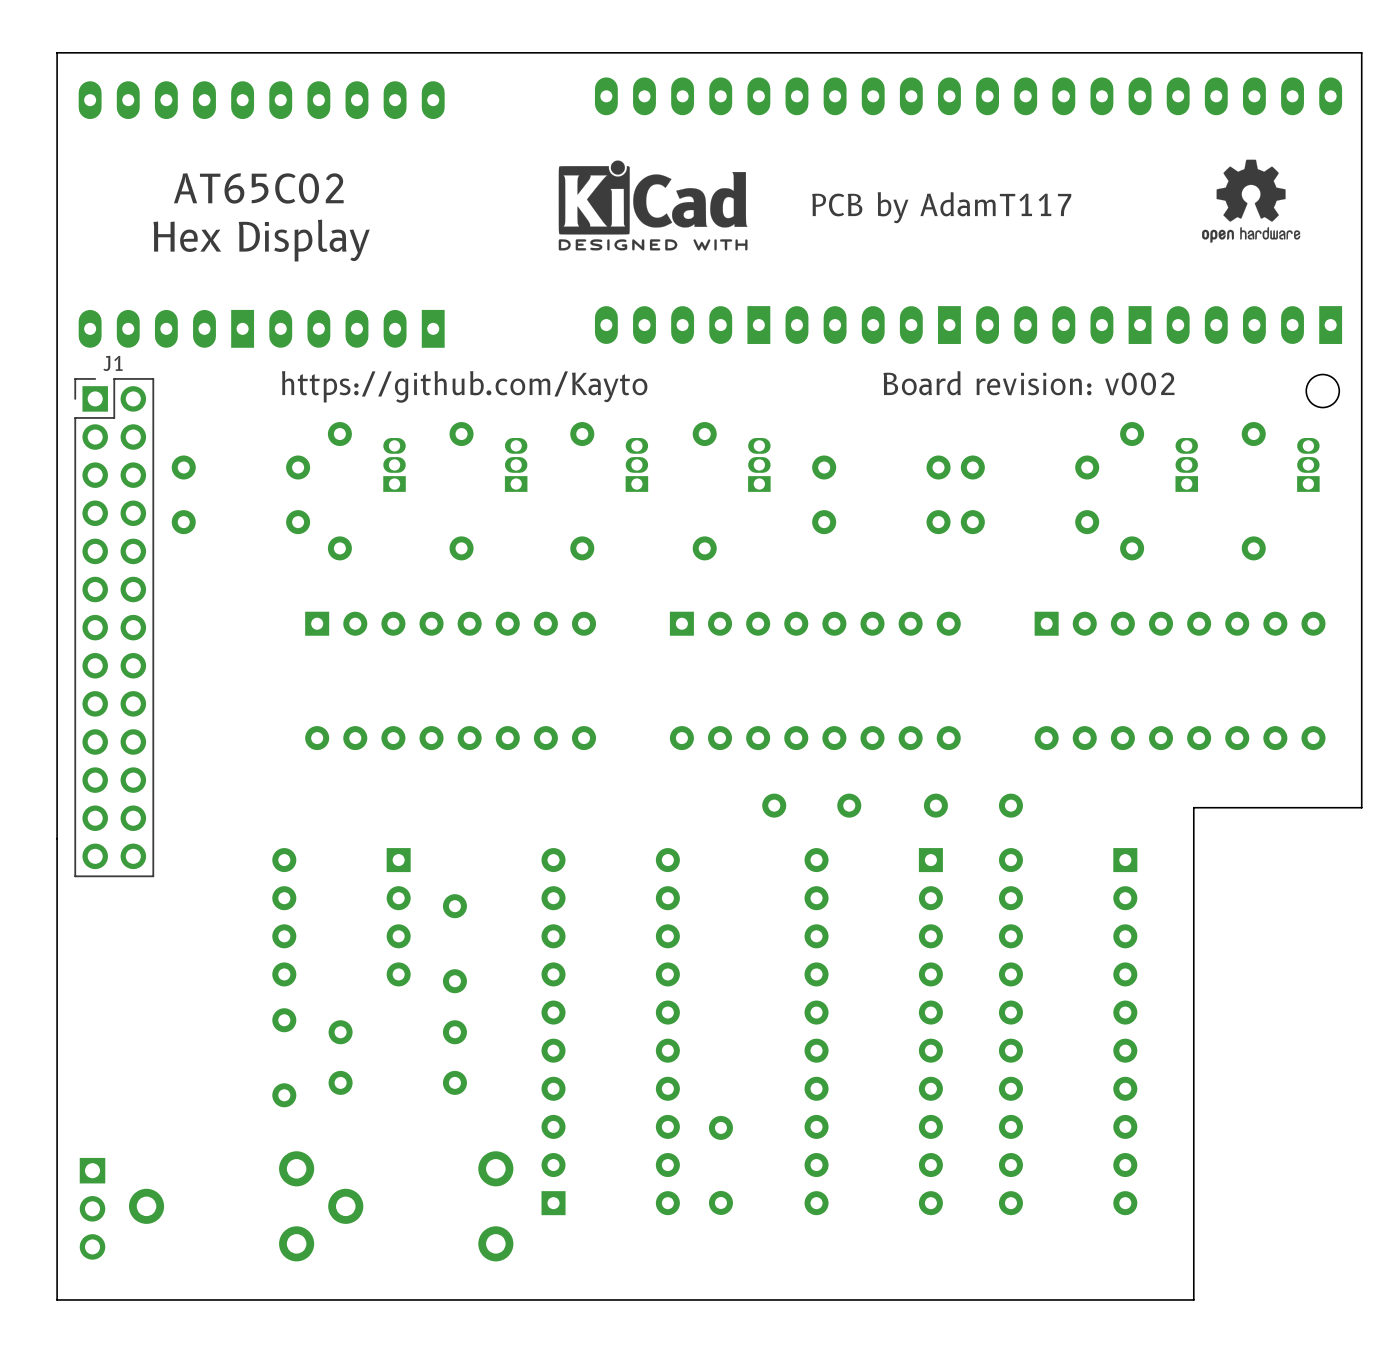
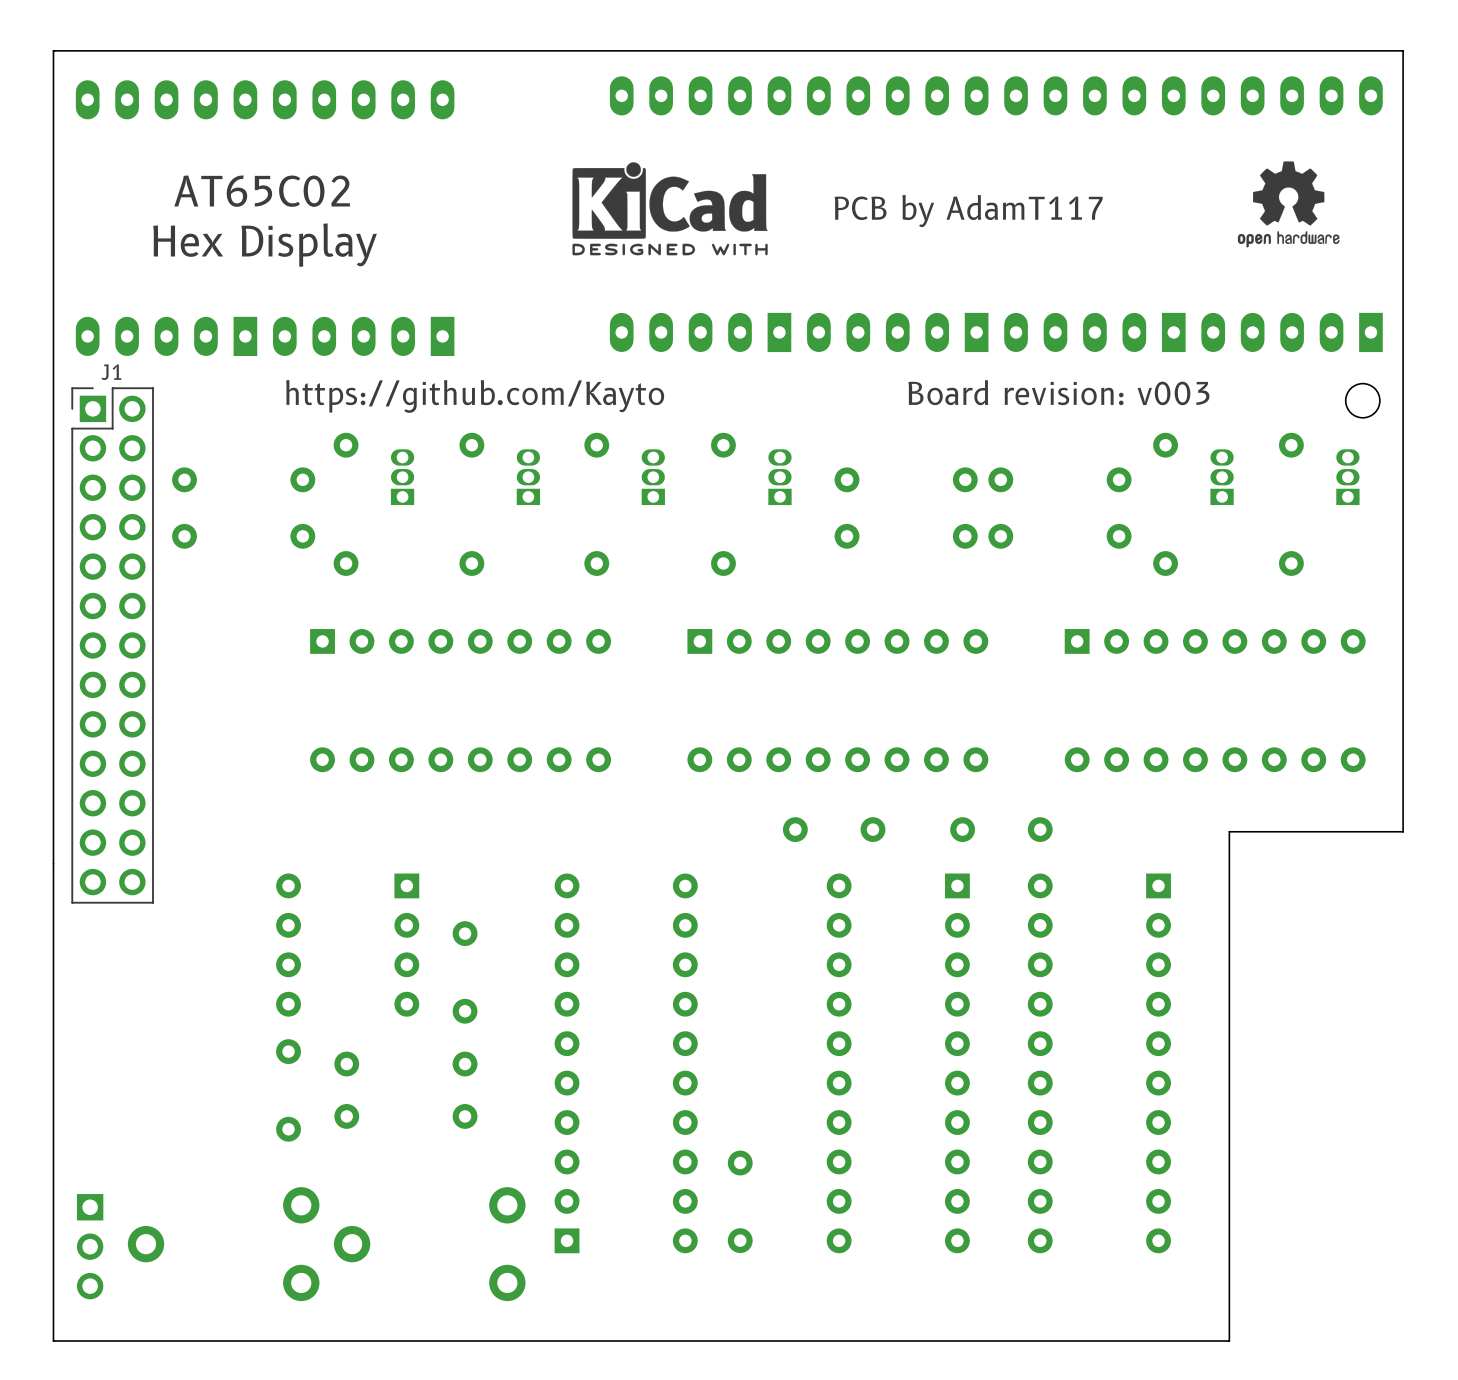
text: Board revision: v002 (1029, 383) -> Board revision: v003 (1058, 392)

